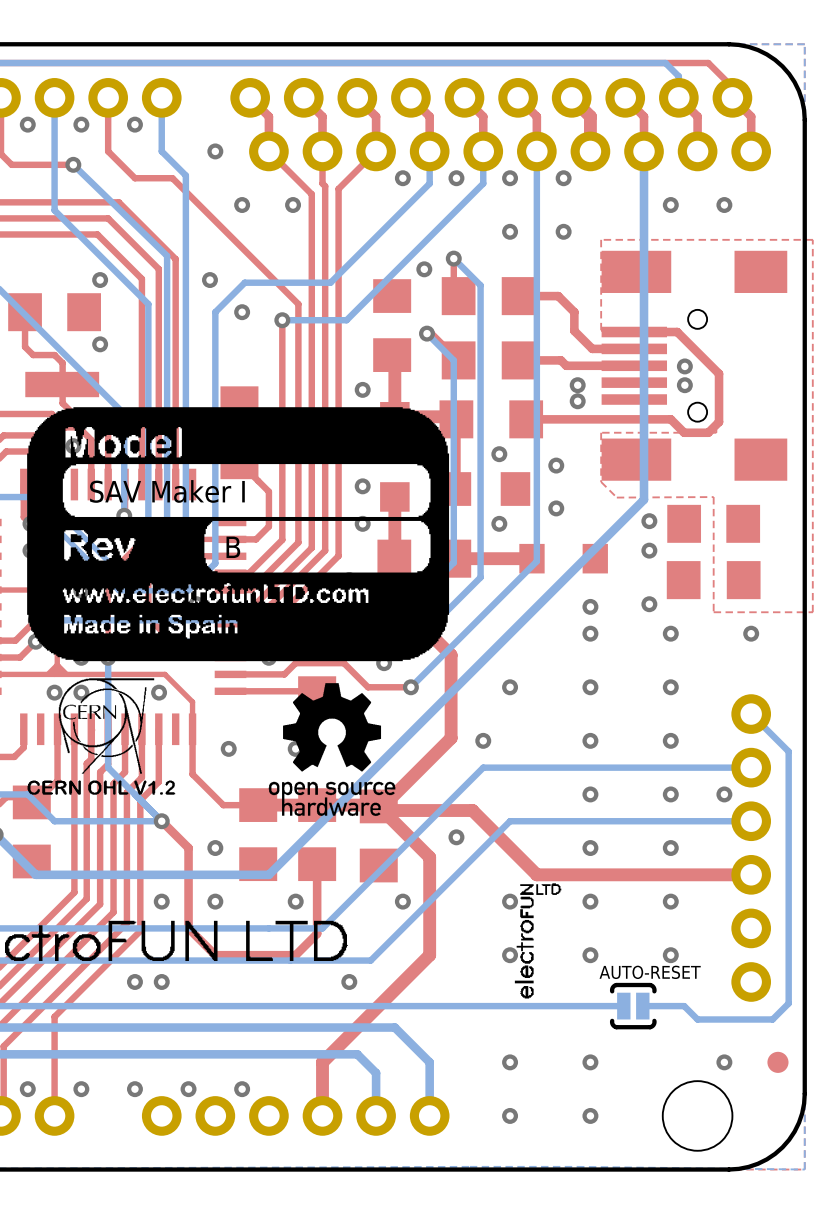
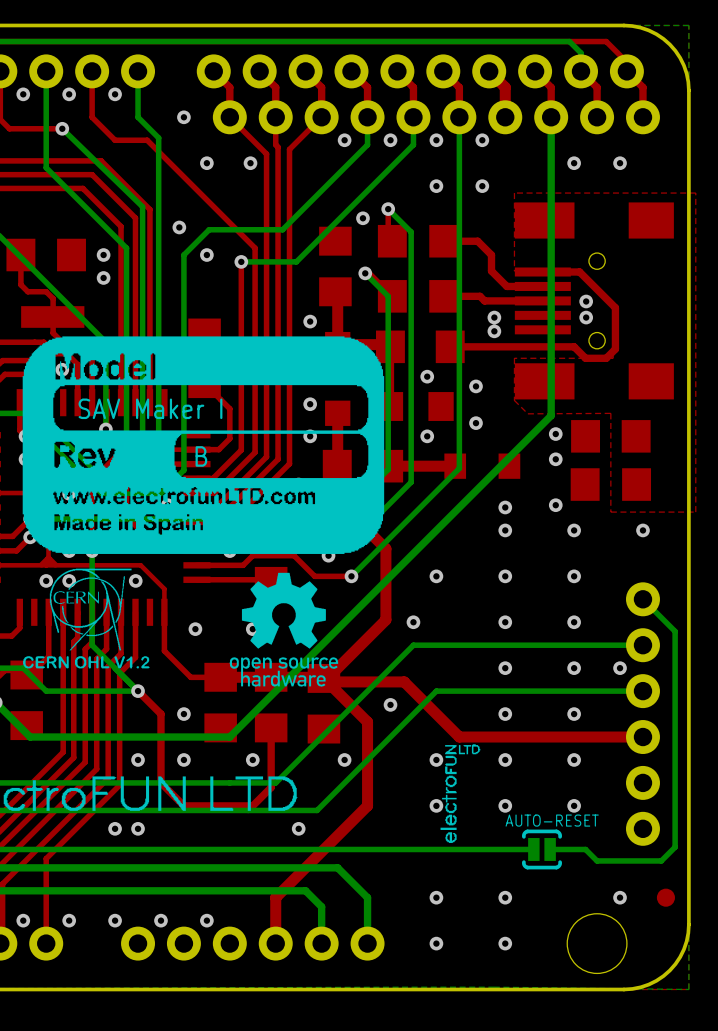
via: (100, 280) -> none
via: none -> (103, 255)
via: none -> (103, 277)
via: (100, 344) -> none

